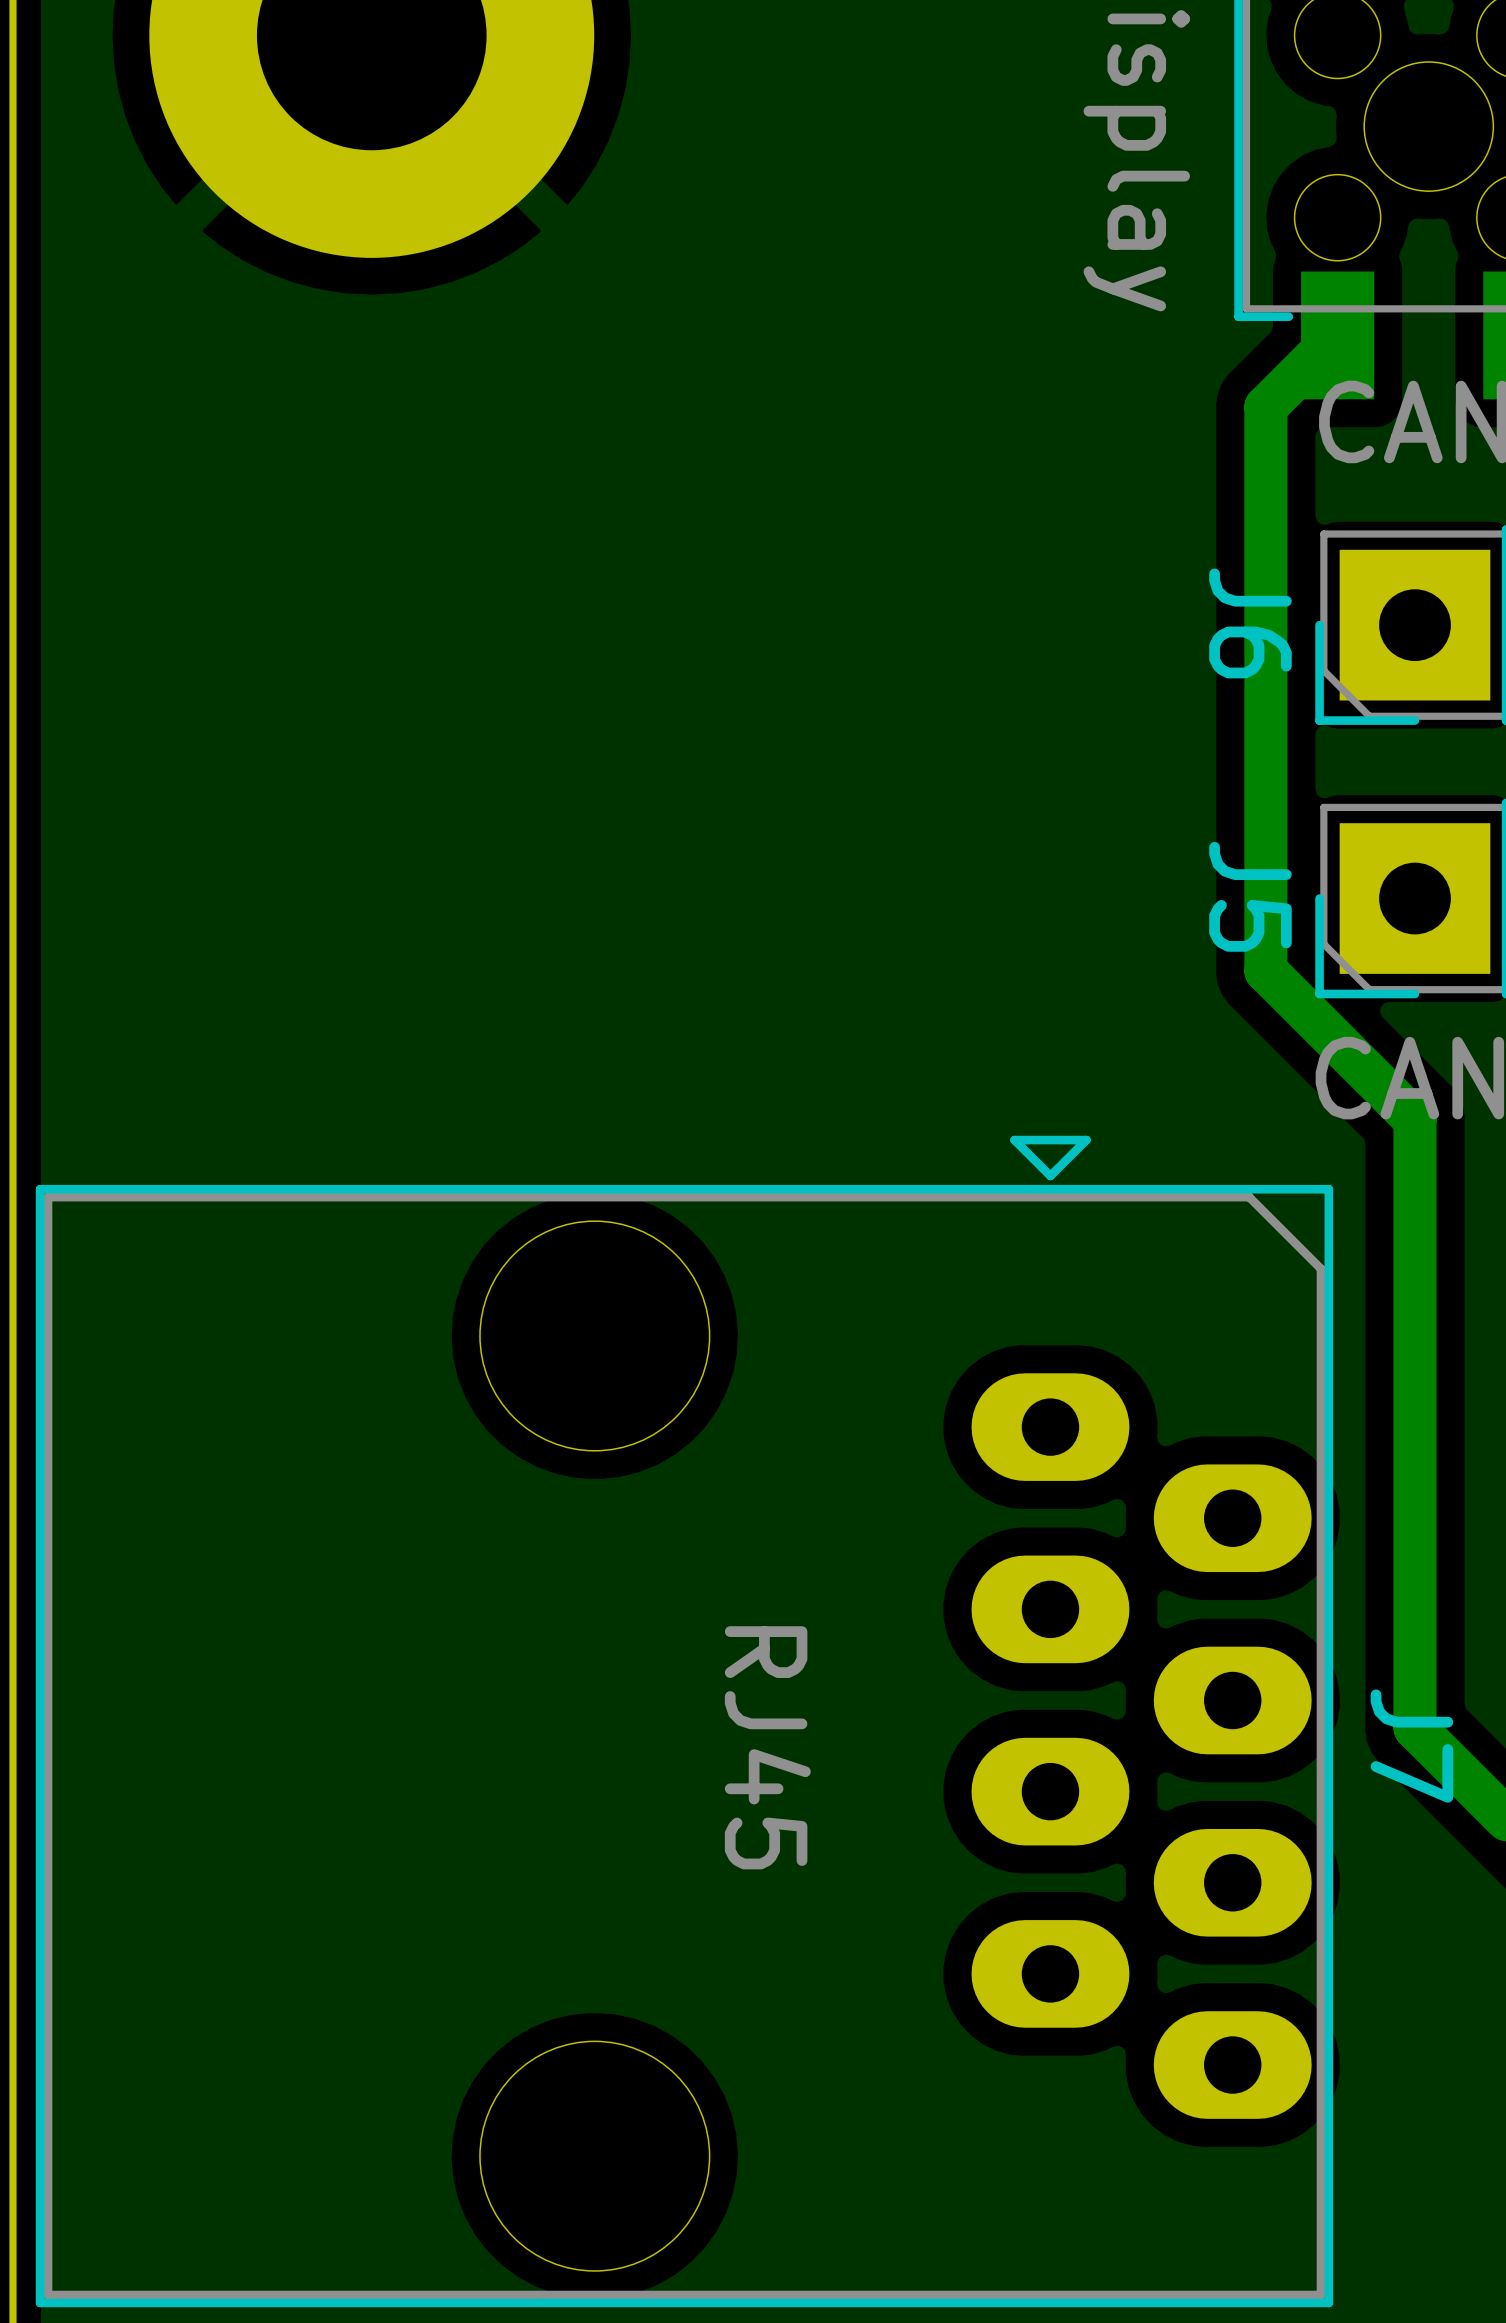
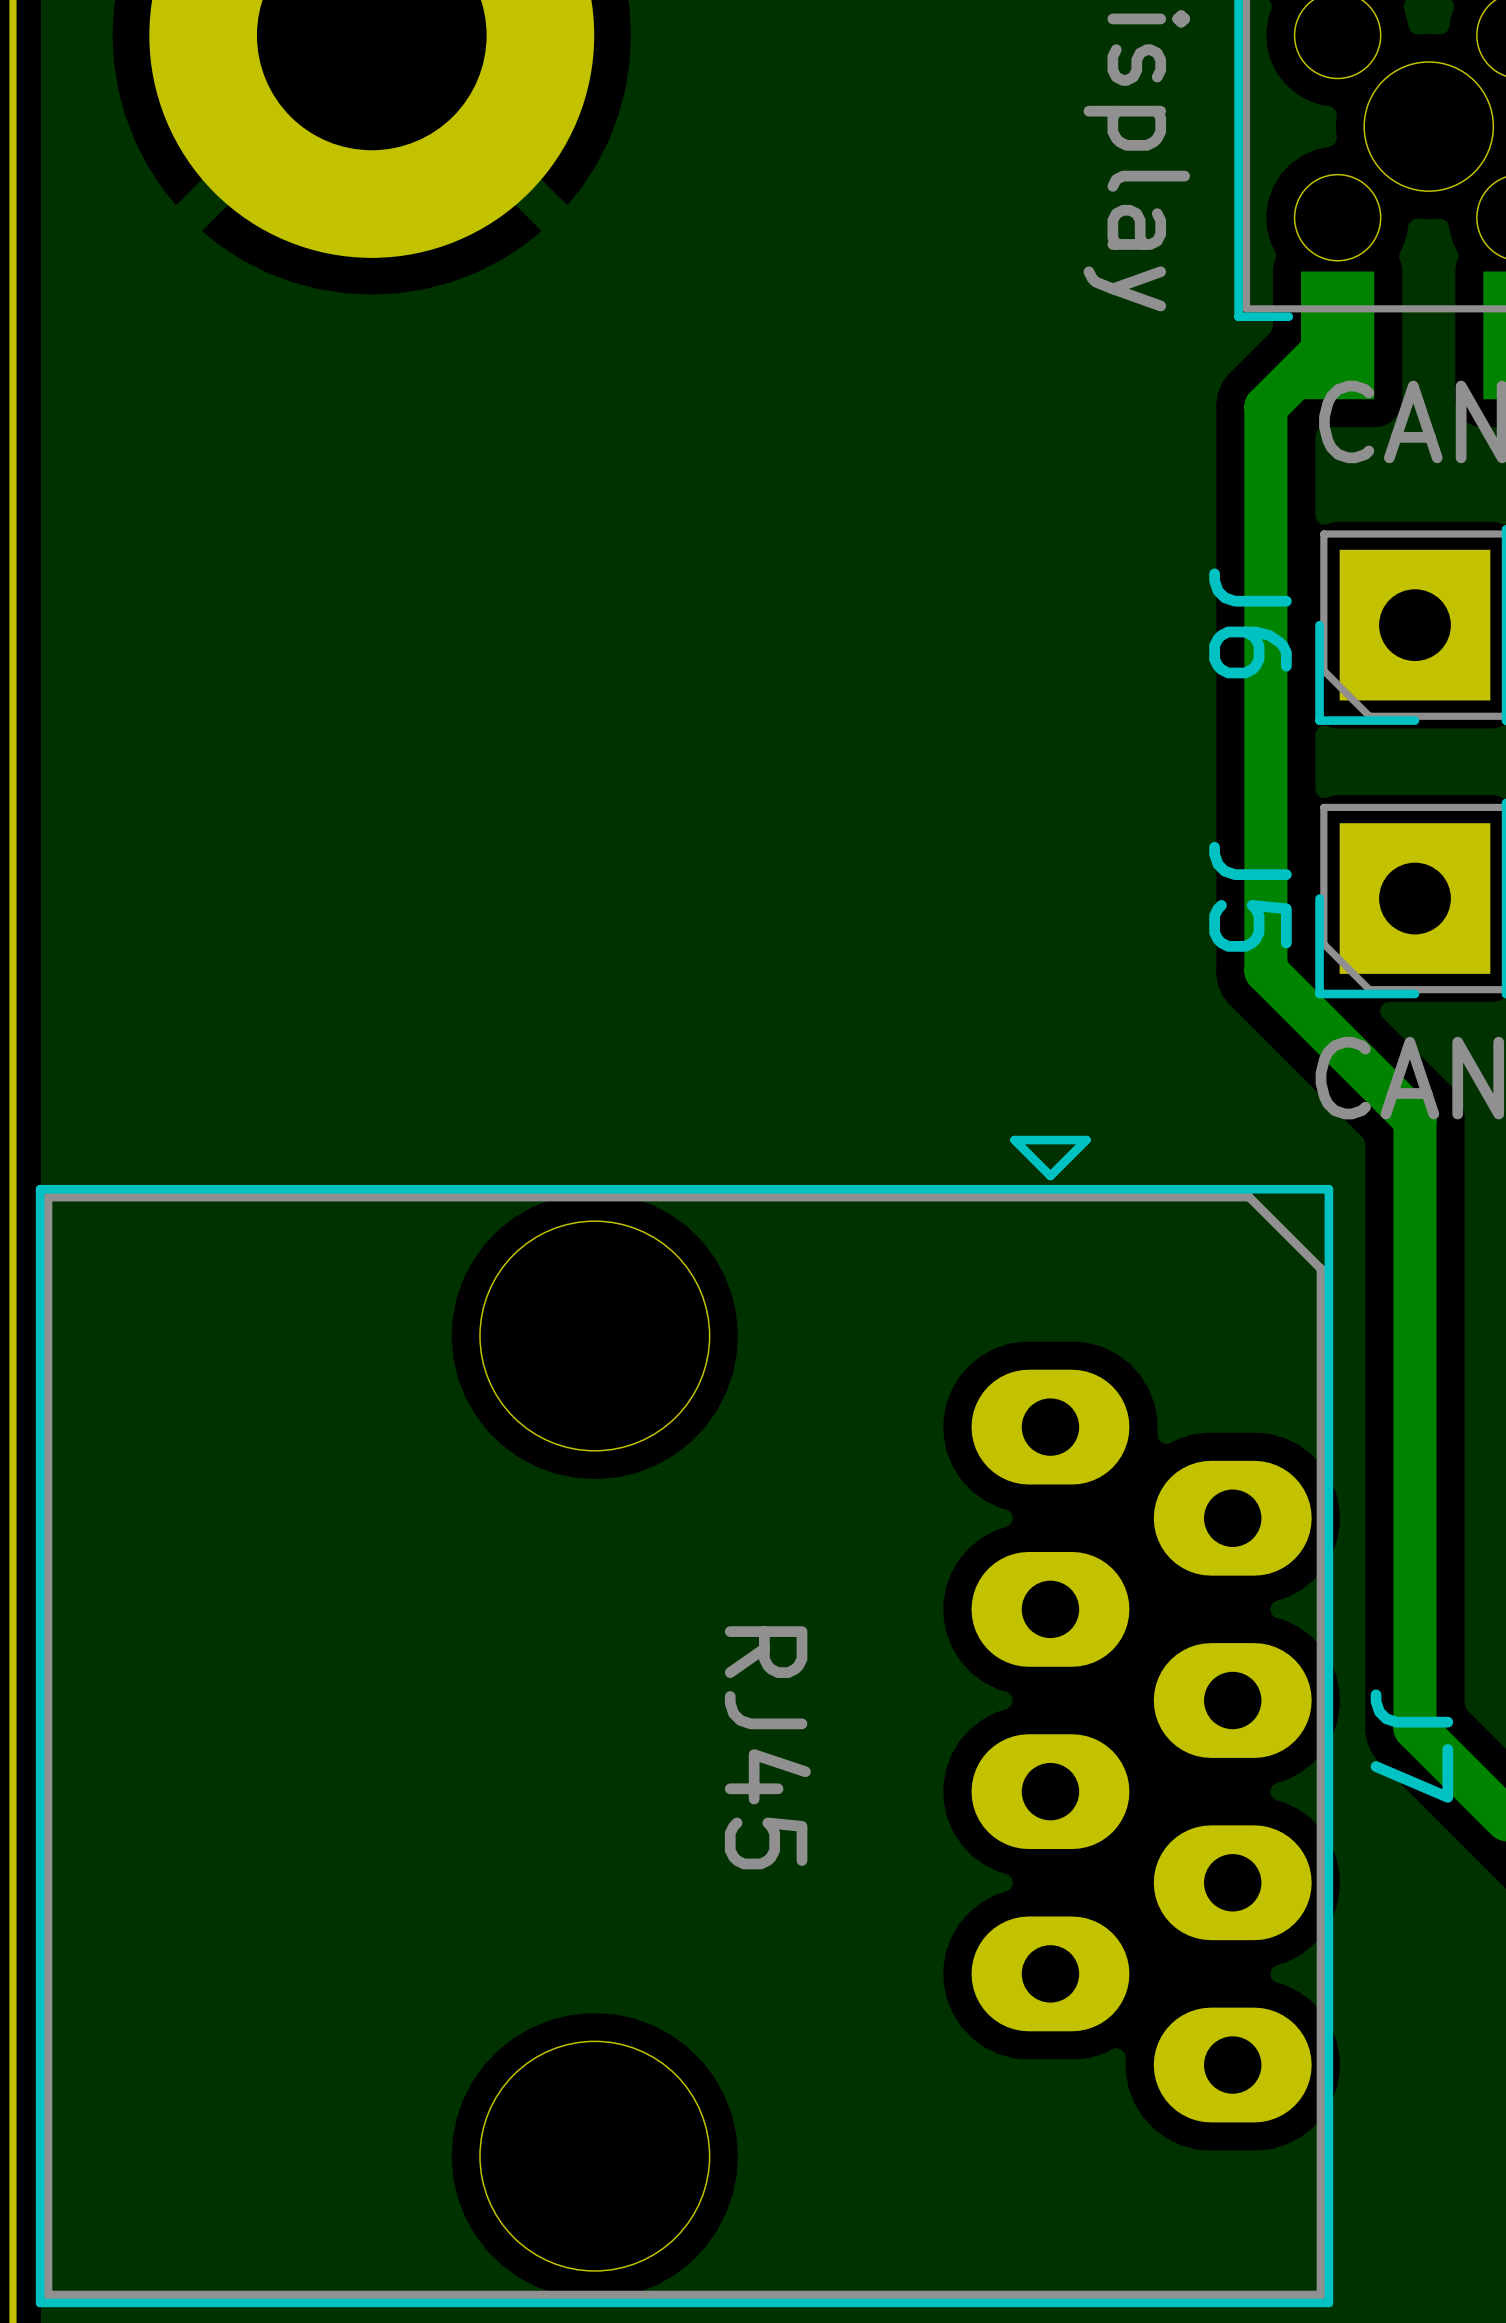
J7 footprint: [35, 1135, 1334, 2308] -> [35, 1135, 1334, 2308]

